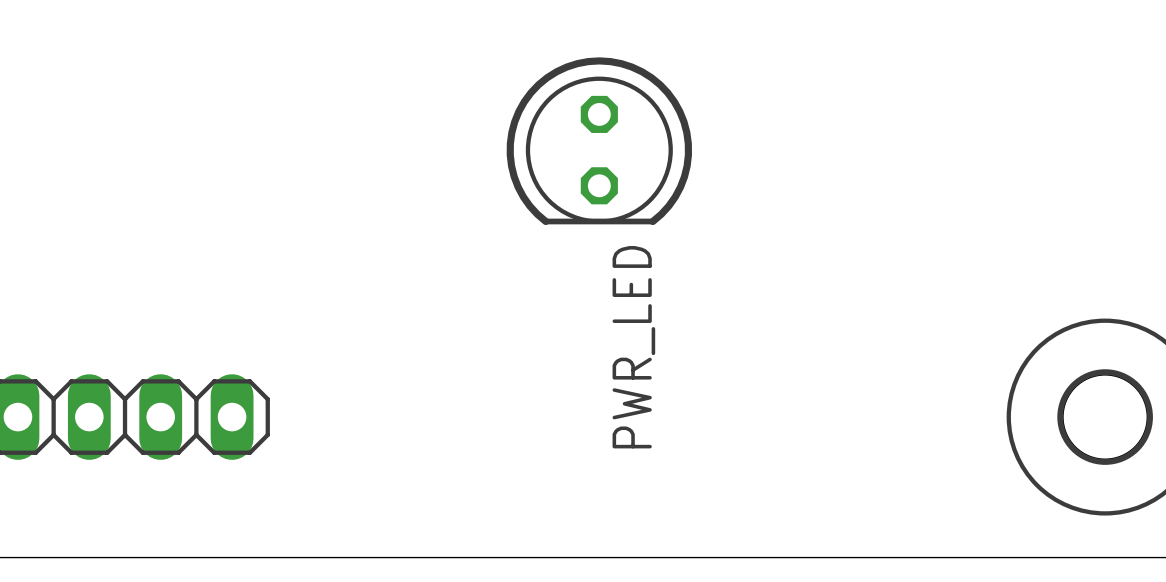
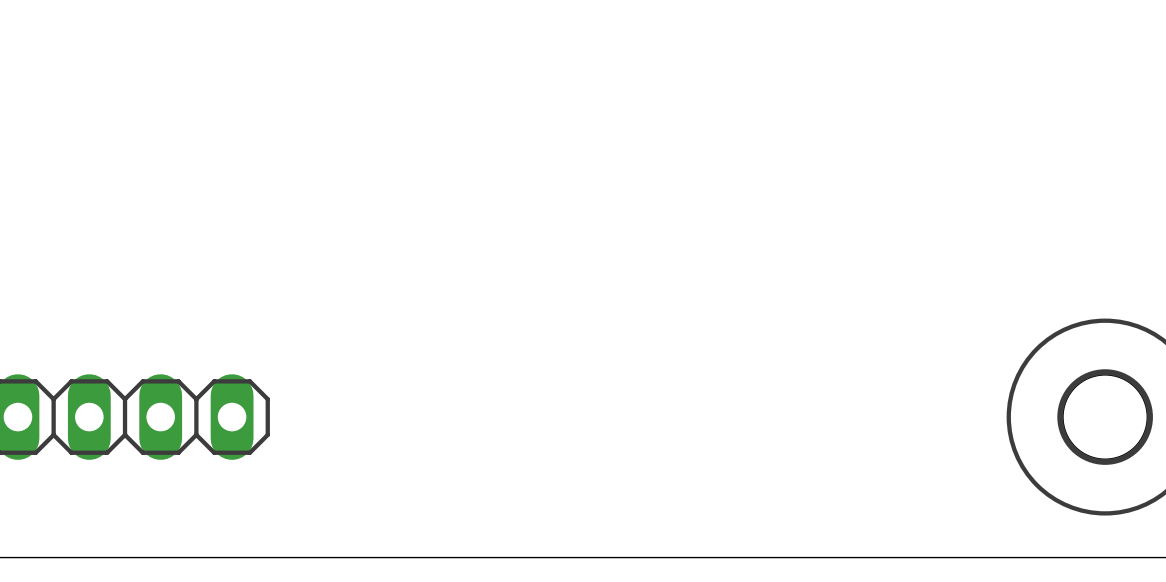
PWR_LED: (599, 141) -> none

